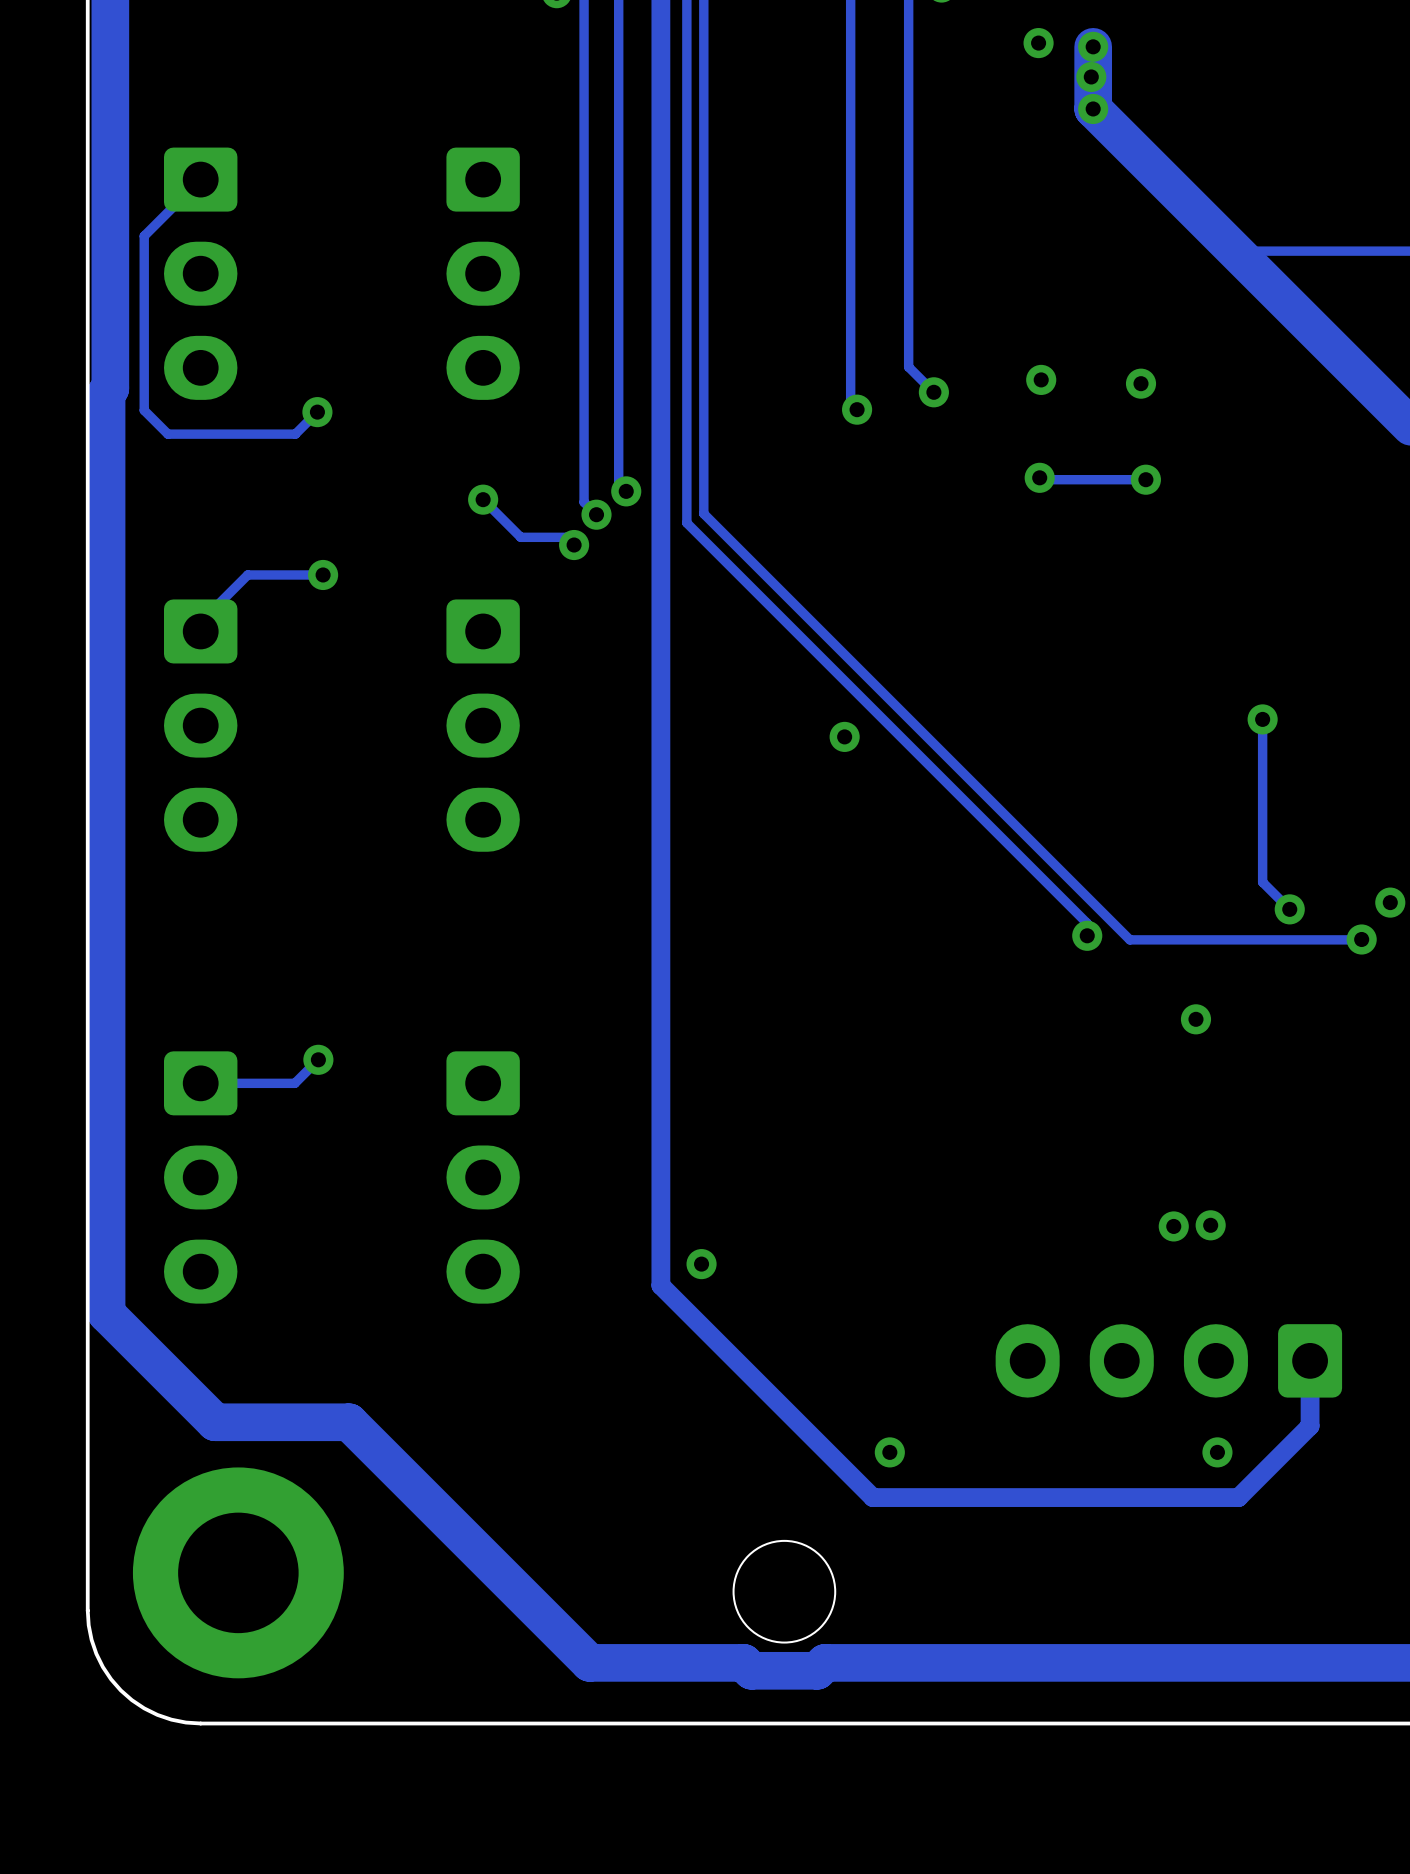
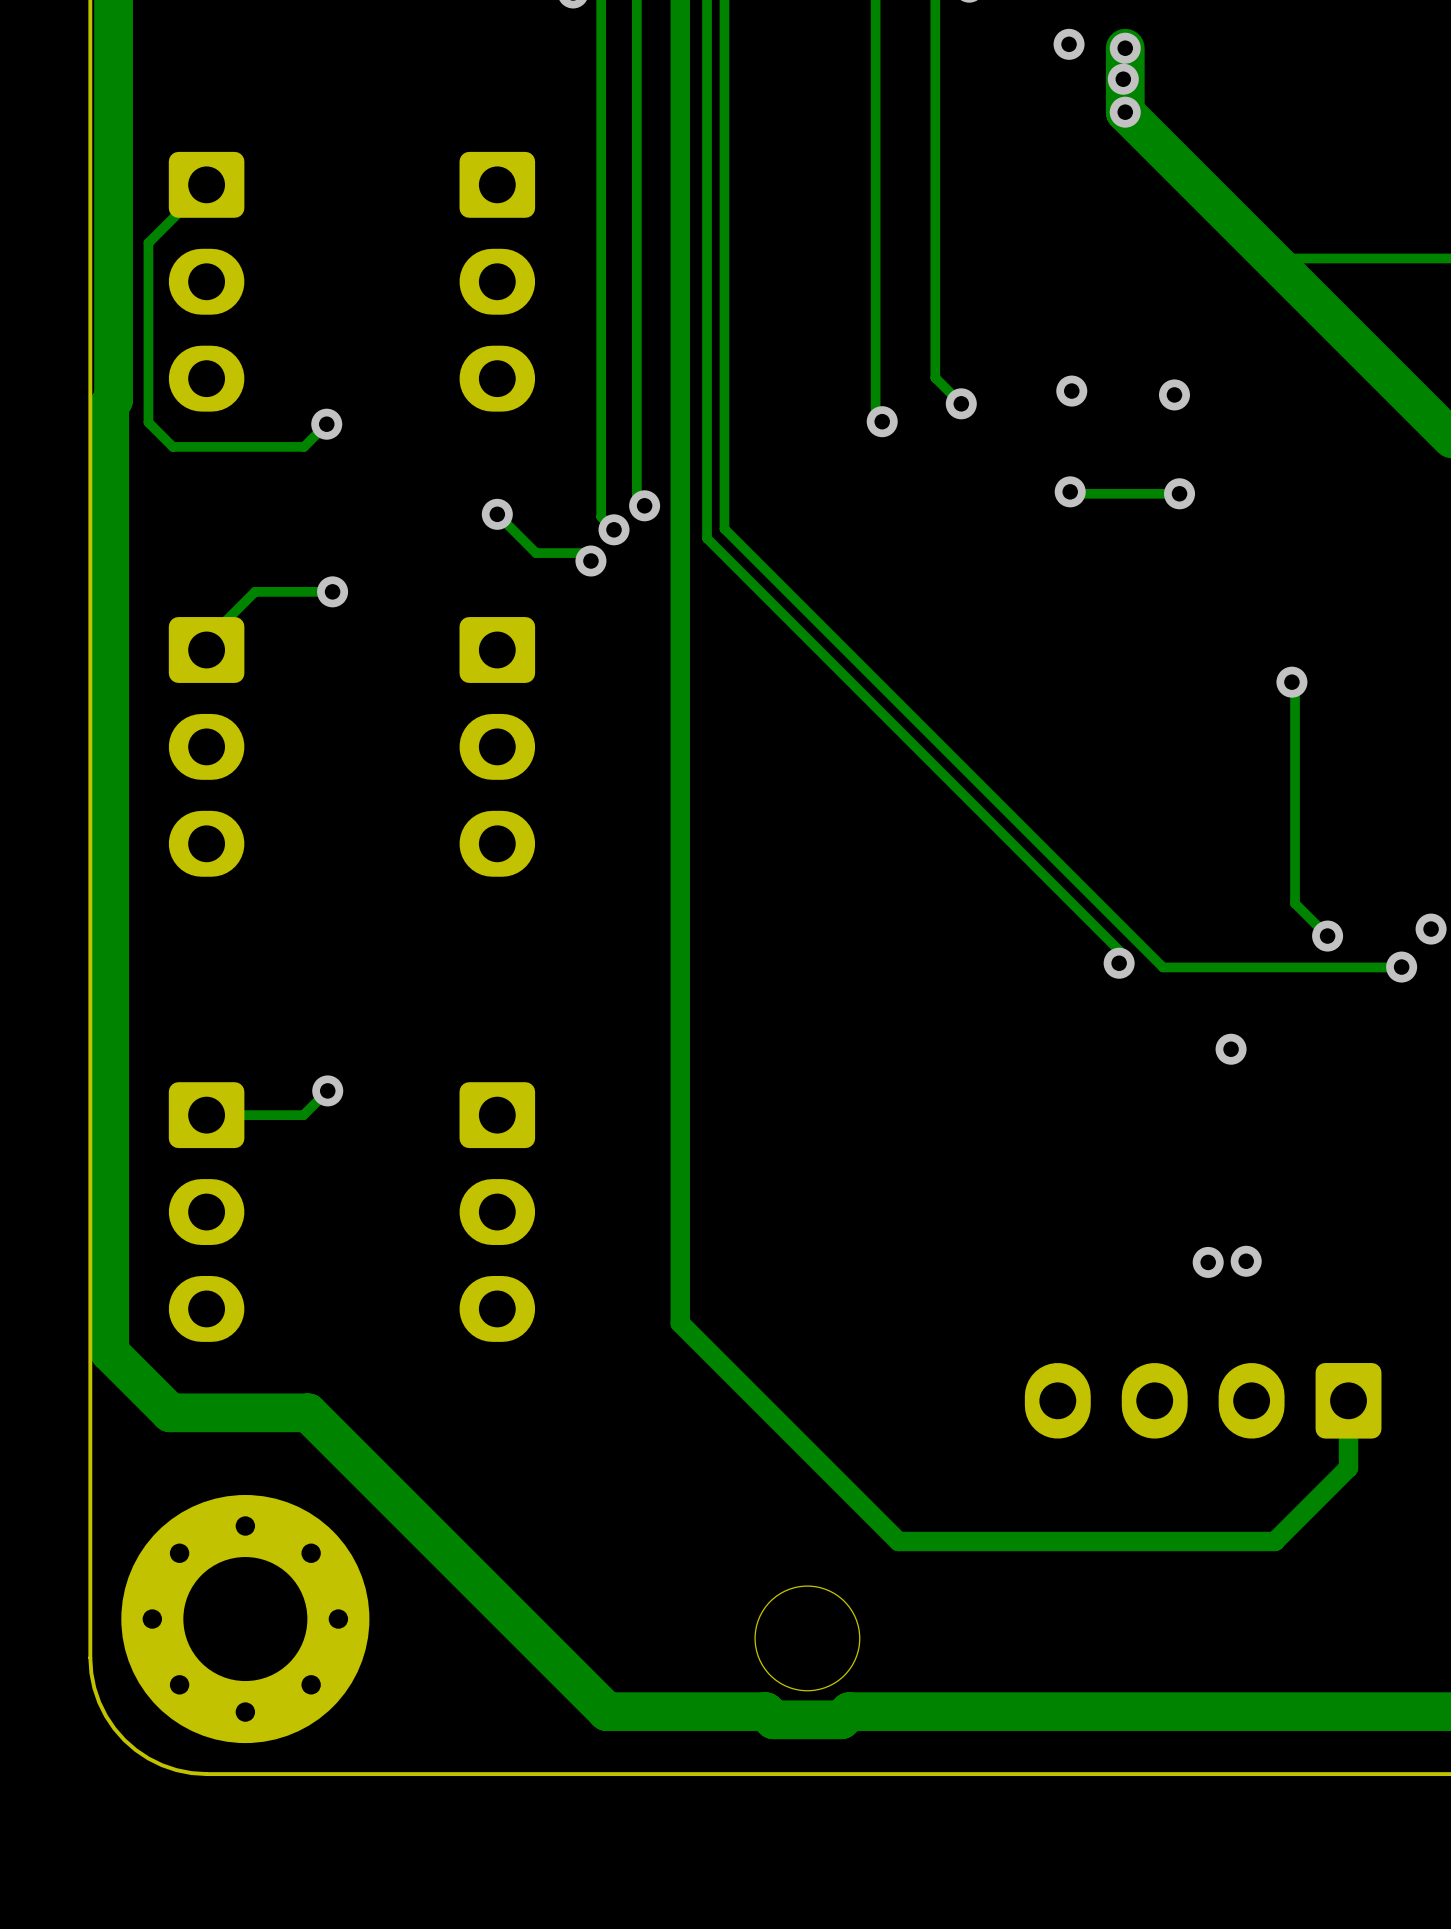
track: (1262, 719) (1262, 882) -> (1295, 685) (1295, 903) (1299, 908)
via position: (1262, 719) -> (1291, 682)
via: (844, 736) -> none
via: (701, 1264) -> none
track: (165, 1372) (215, 1422) (349, 1422) -> (170, 1412) (308, 1412) (359, 1463)
via: (889, 1452) -> none
via: (1217, 1452) -> none
part footprint: [132, 1467, 344, 1679] -> [121, 1494, 370, 1744]

